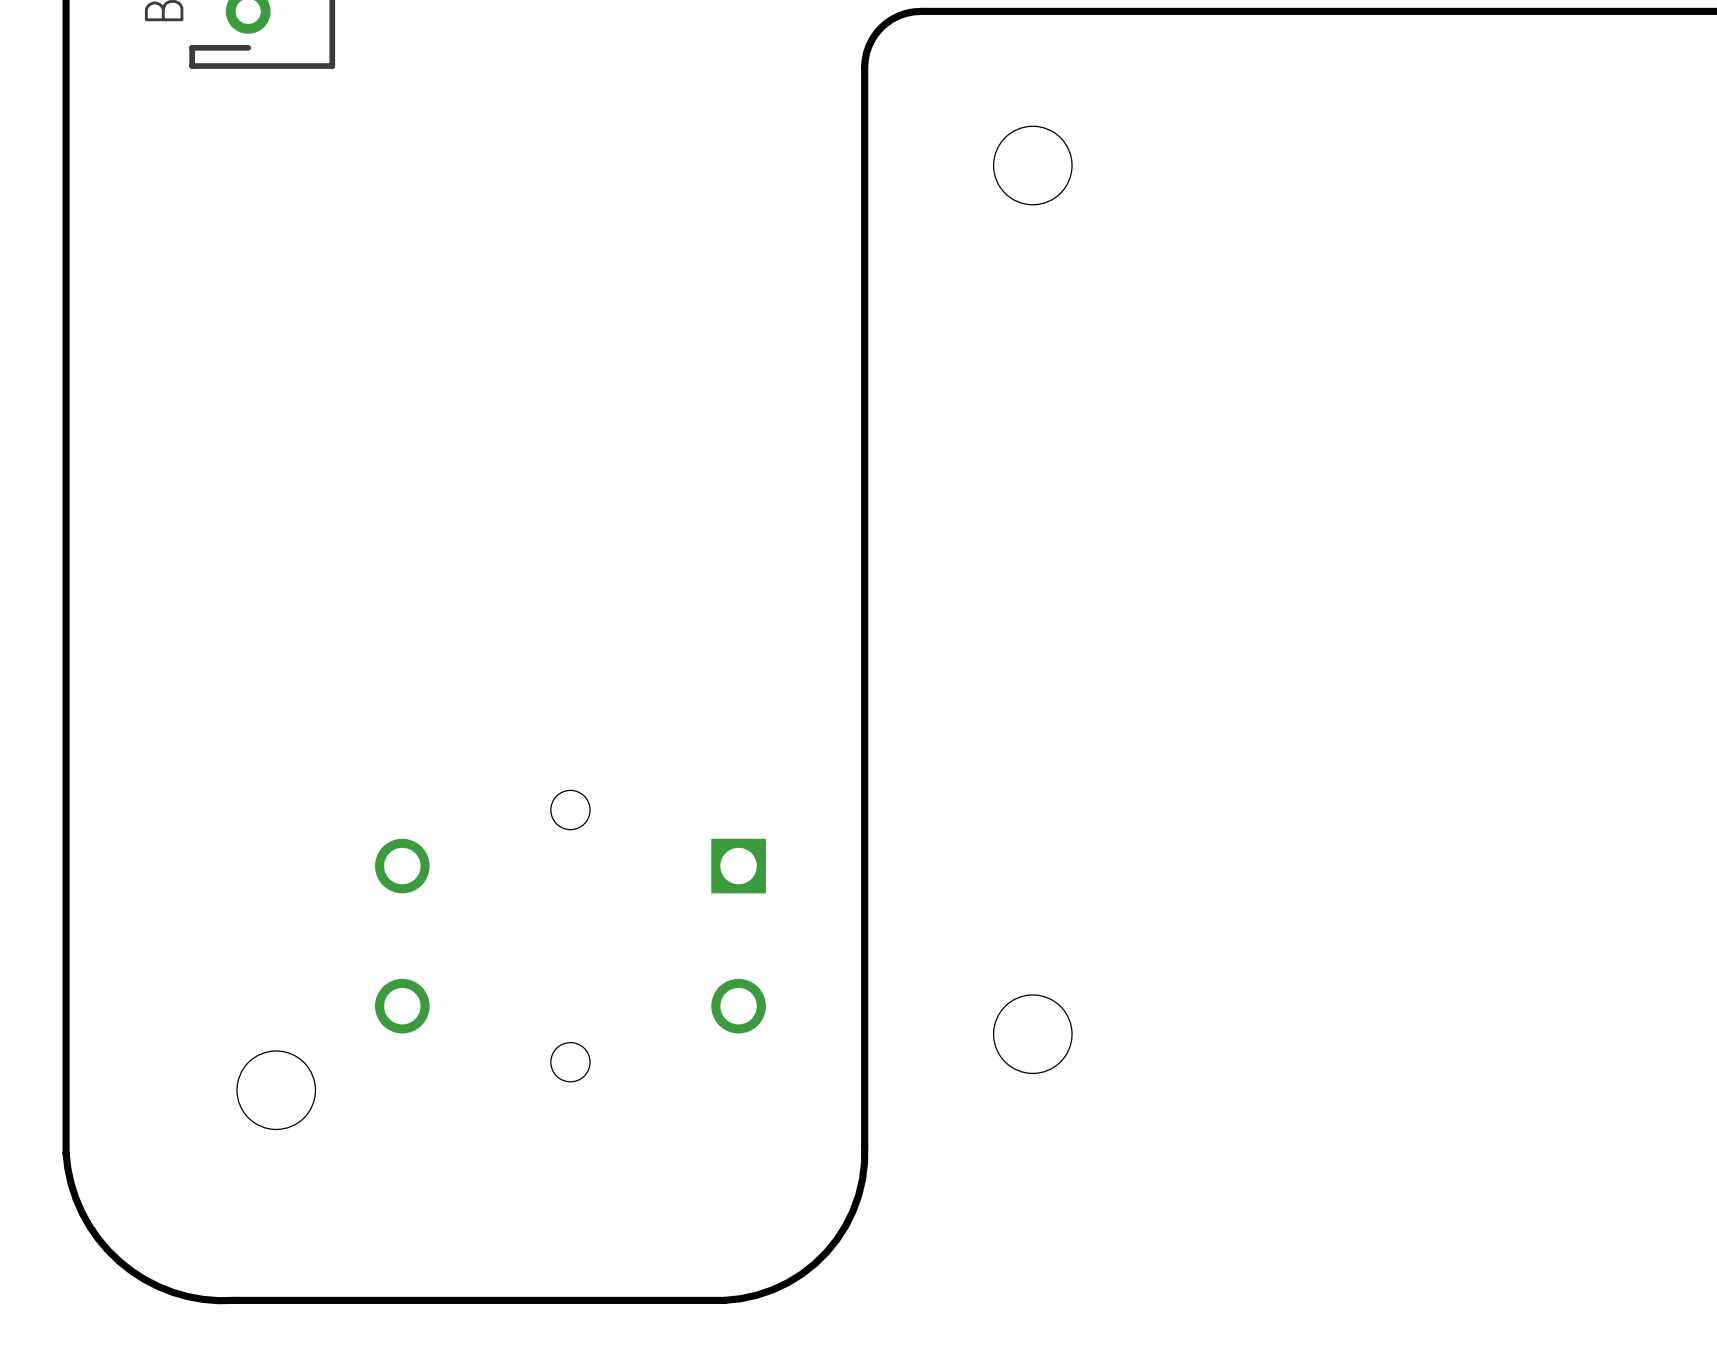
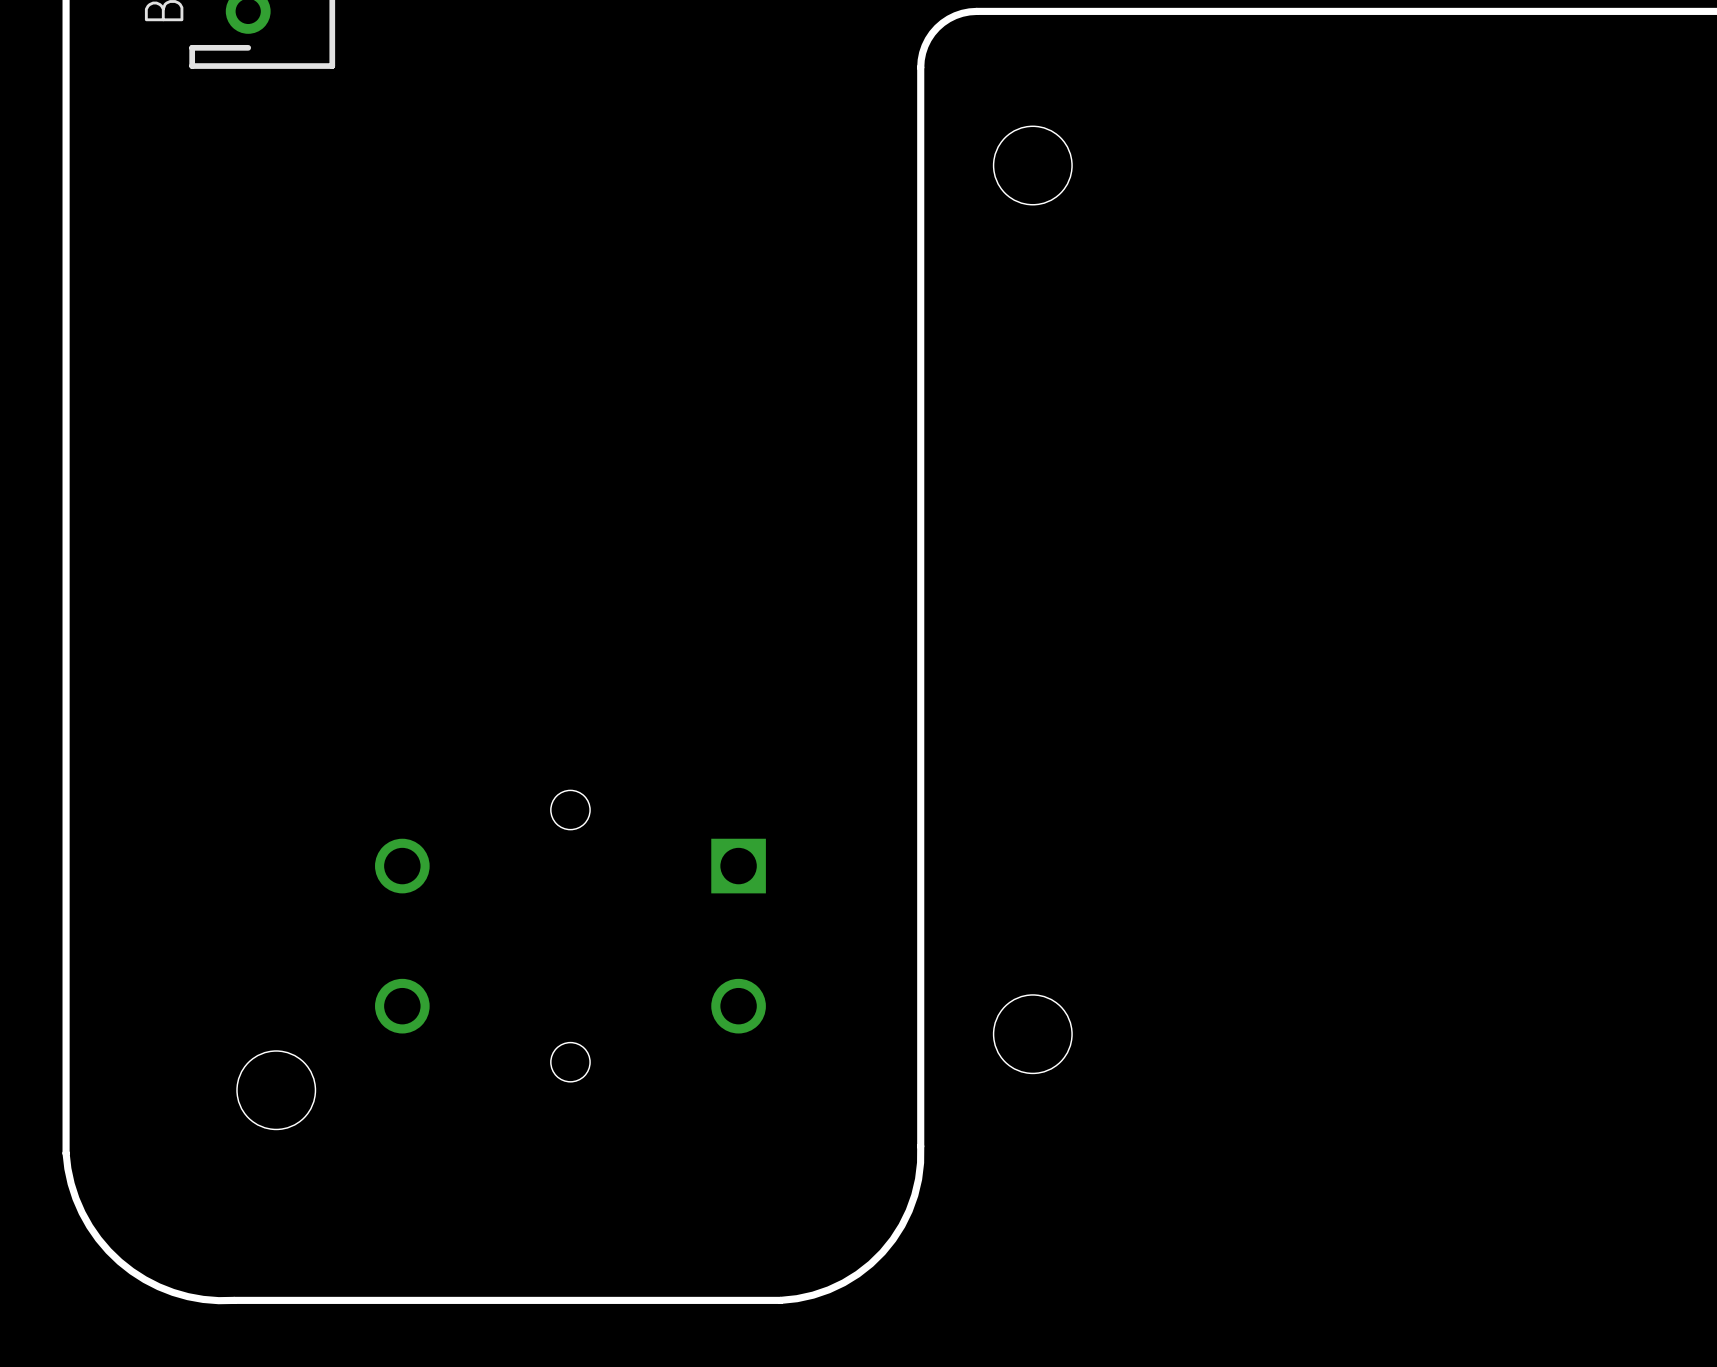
board edge: (976, 11) (920, 11) (899, 15) (886, 22) (876, 33) (868, 46) (865, 60) (864, 1146) (862, 1179) (858, 1195) (845, 1225) (836, 1239) (814, 1263) (801, 1274) (772, 1289) (741, 1298) (724, 1300) -> (976, 11) (955, 15) (937, 27) (924, 46) (920, 67) (920, 1146) (918, 1179) (909, 1210) (893, 1239) (870, 1263) (857, 1274) (828, 1289) (797, 1298) (724, 1300)

